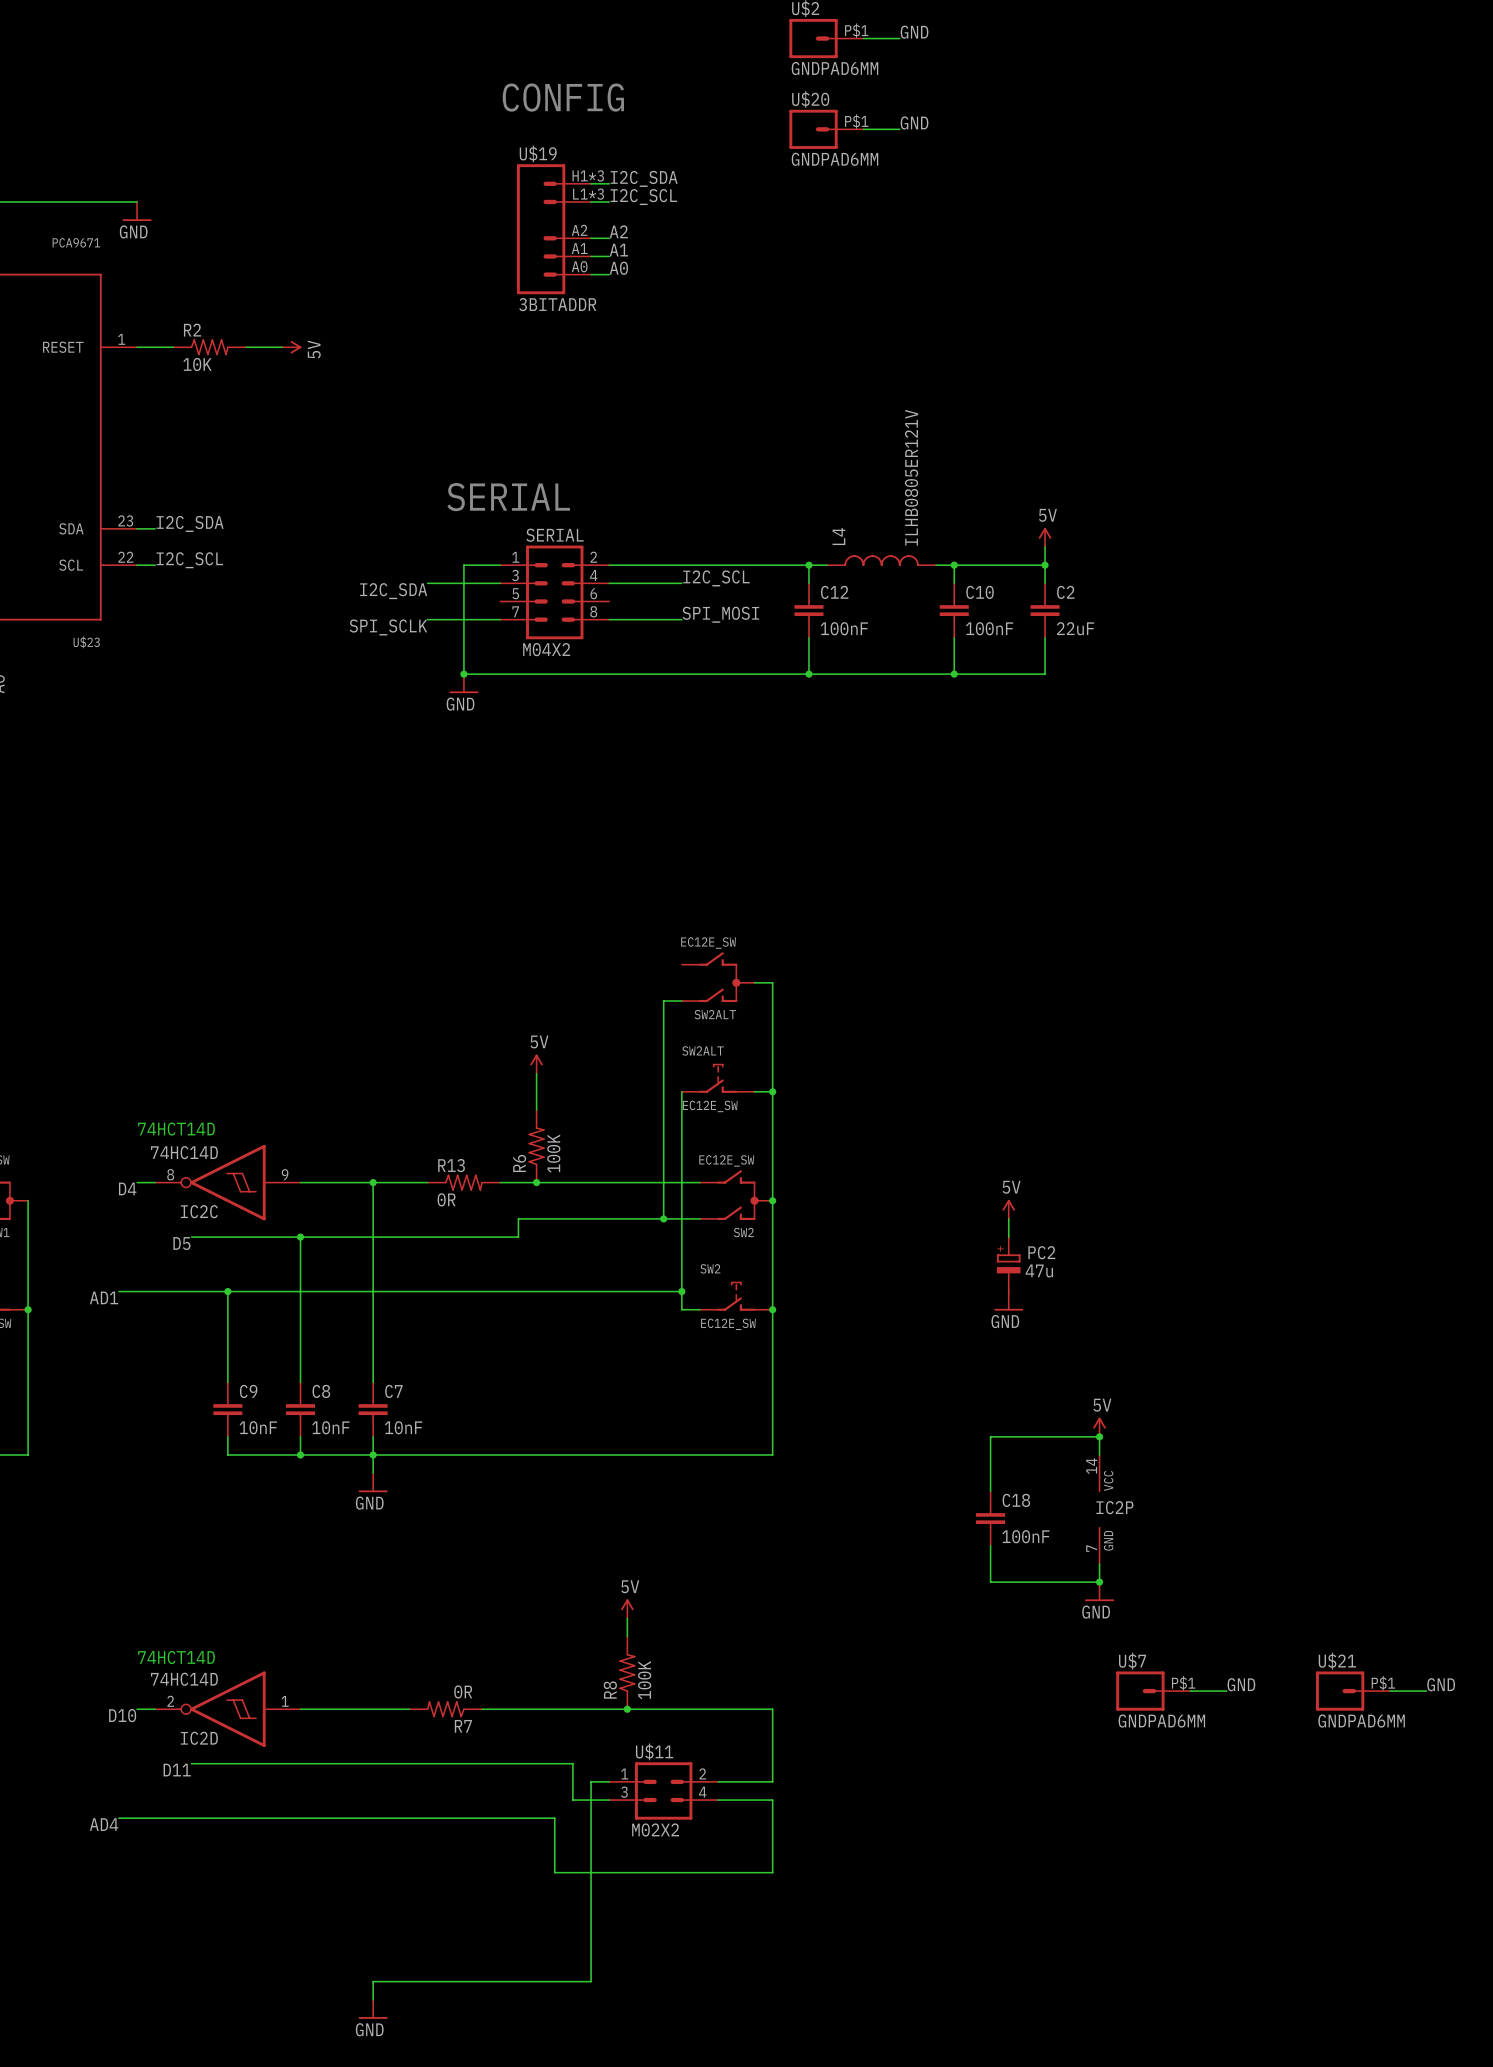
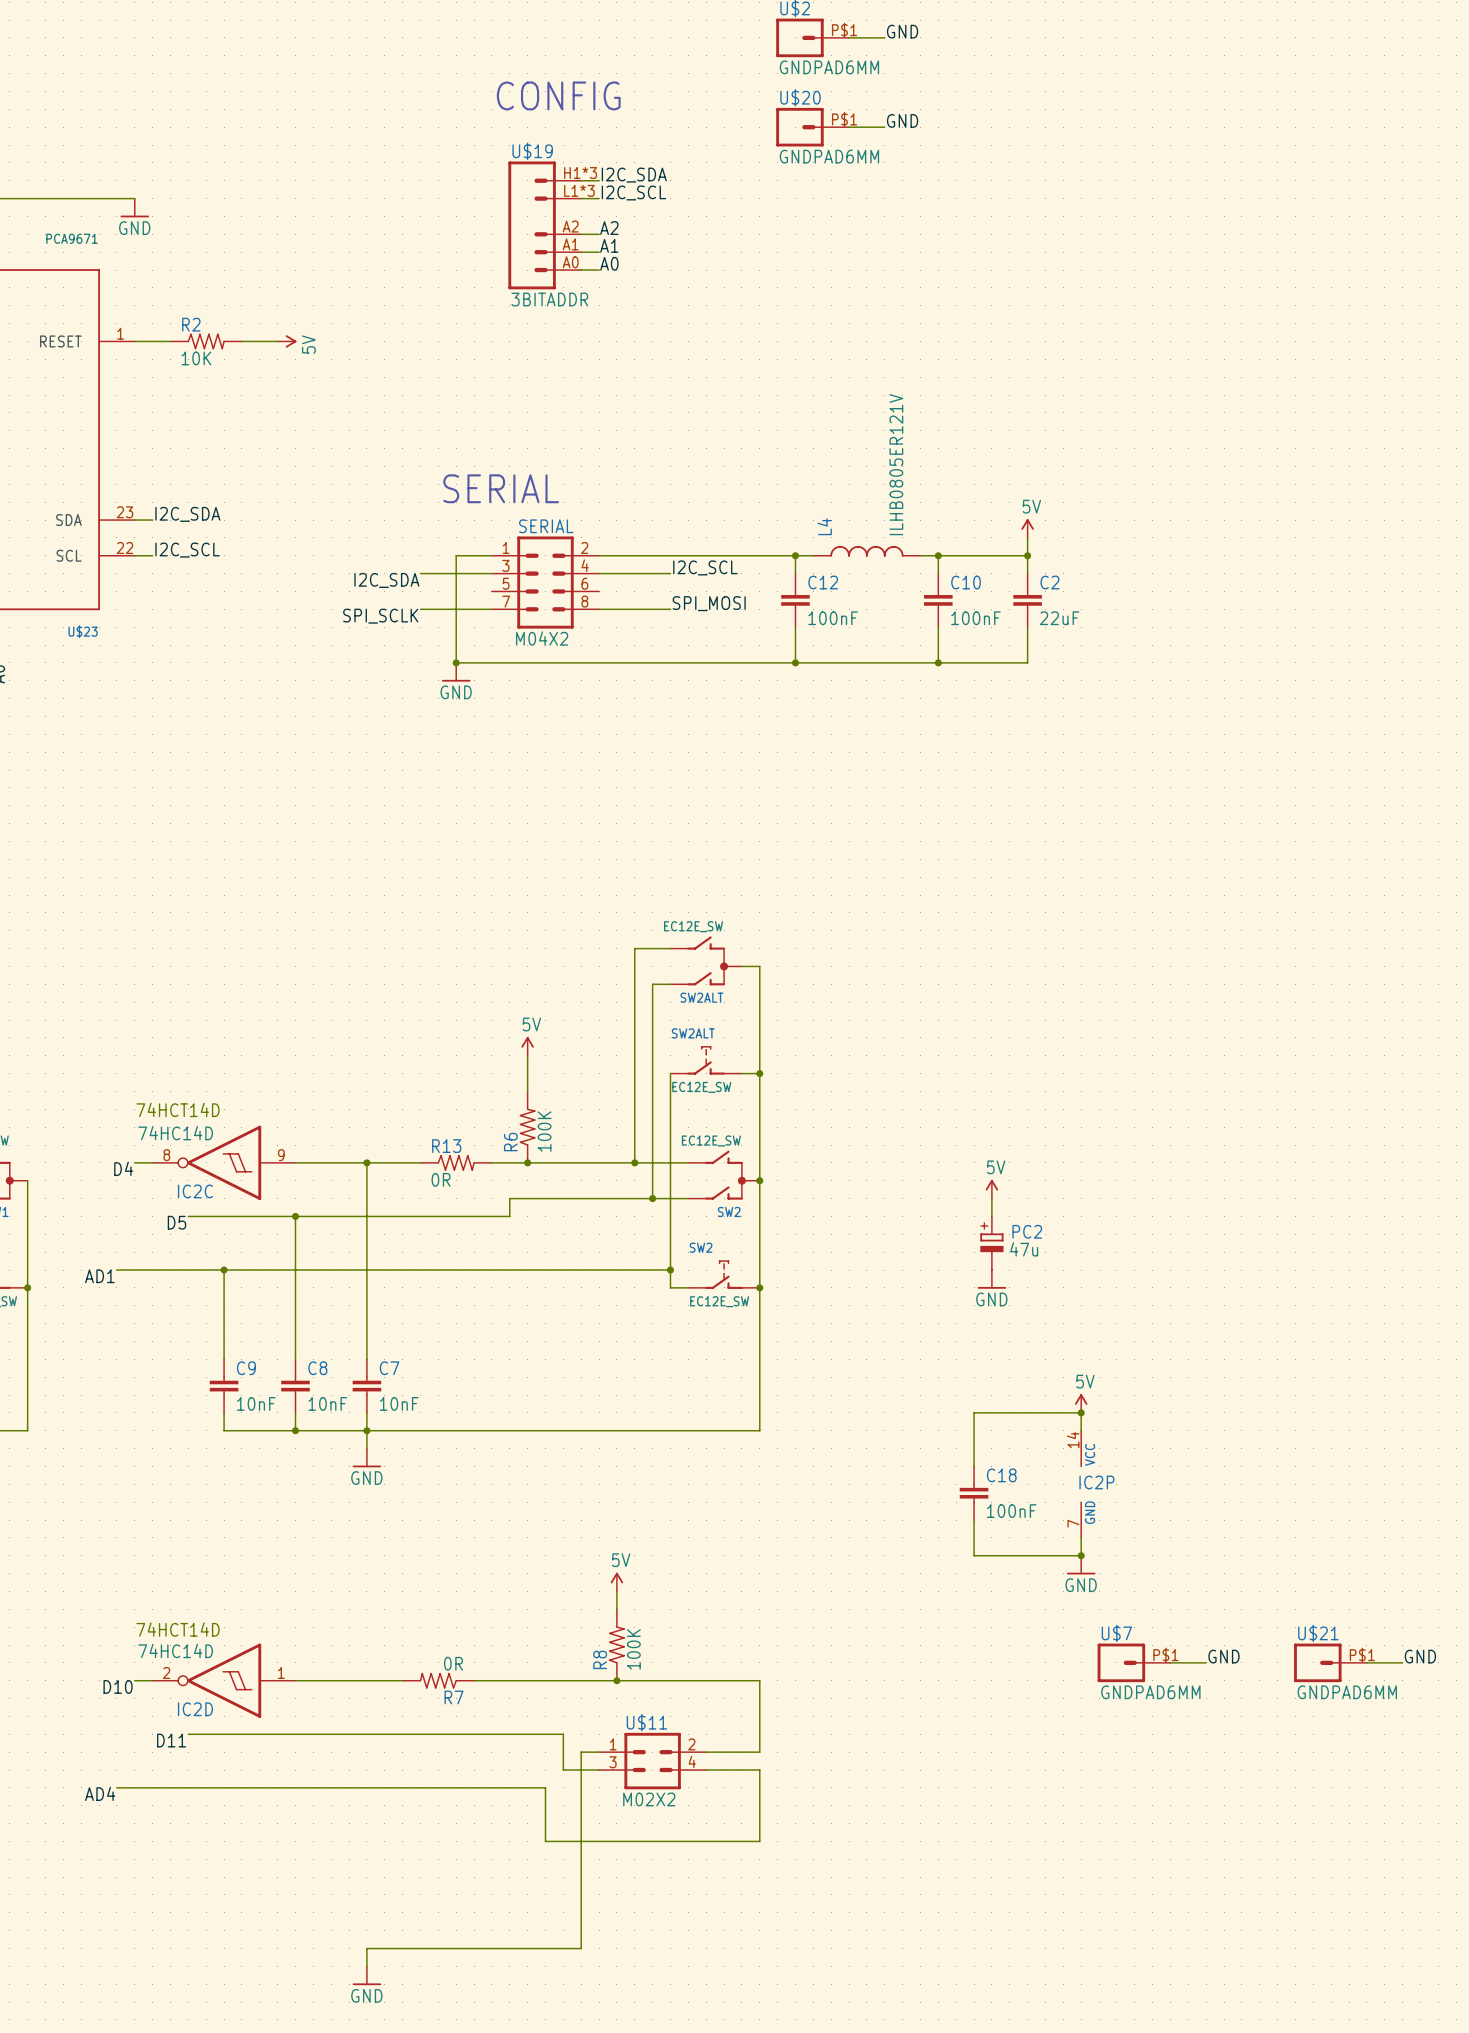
wire: none -> (670, 948) (634, 948) (634, 1162)
junction: none -> (634, 1162)

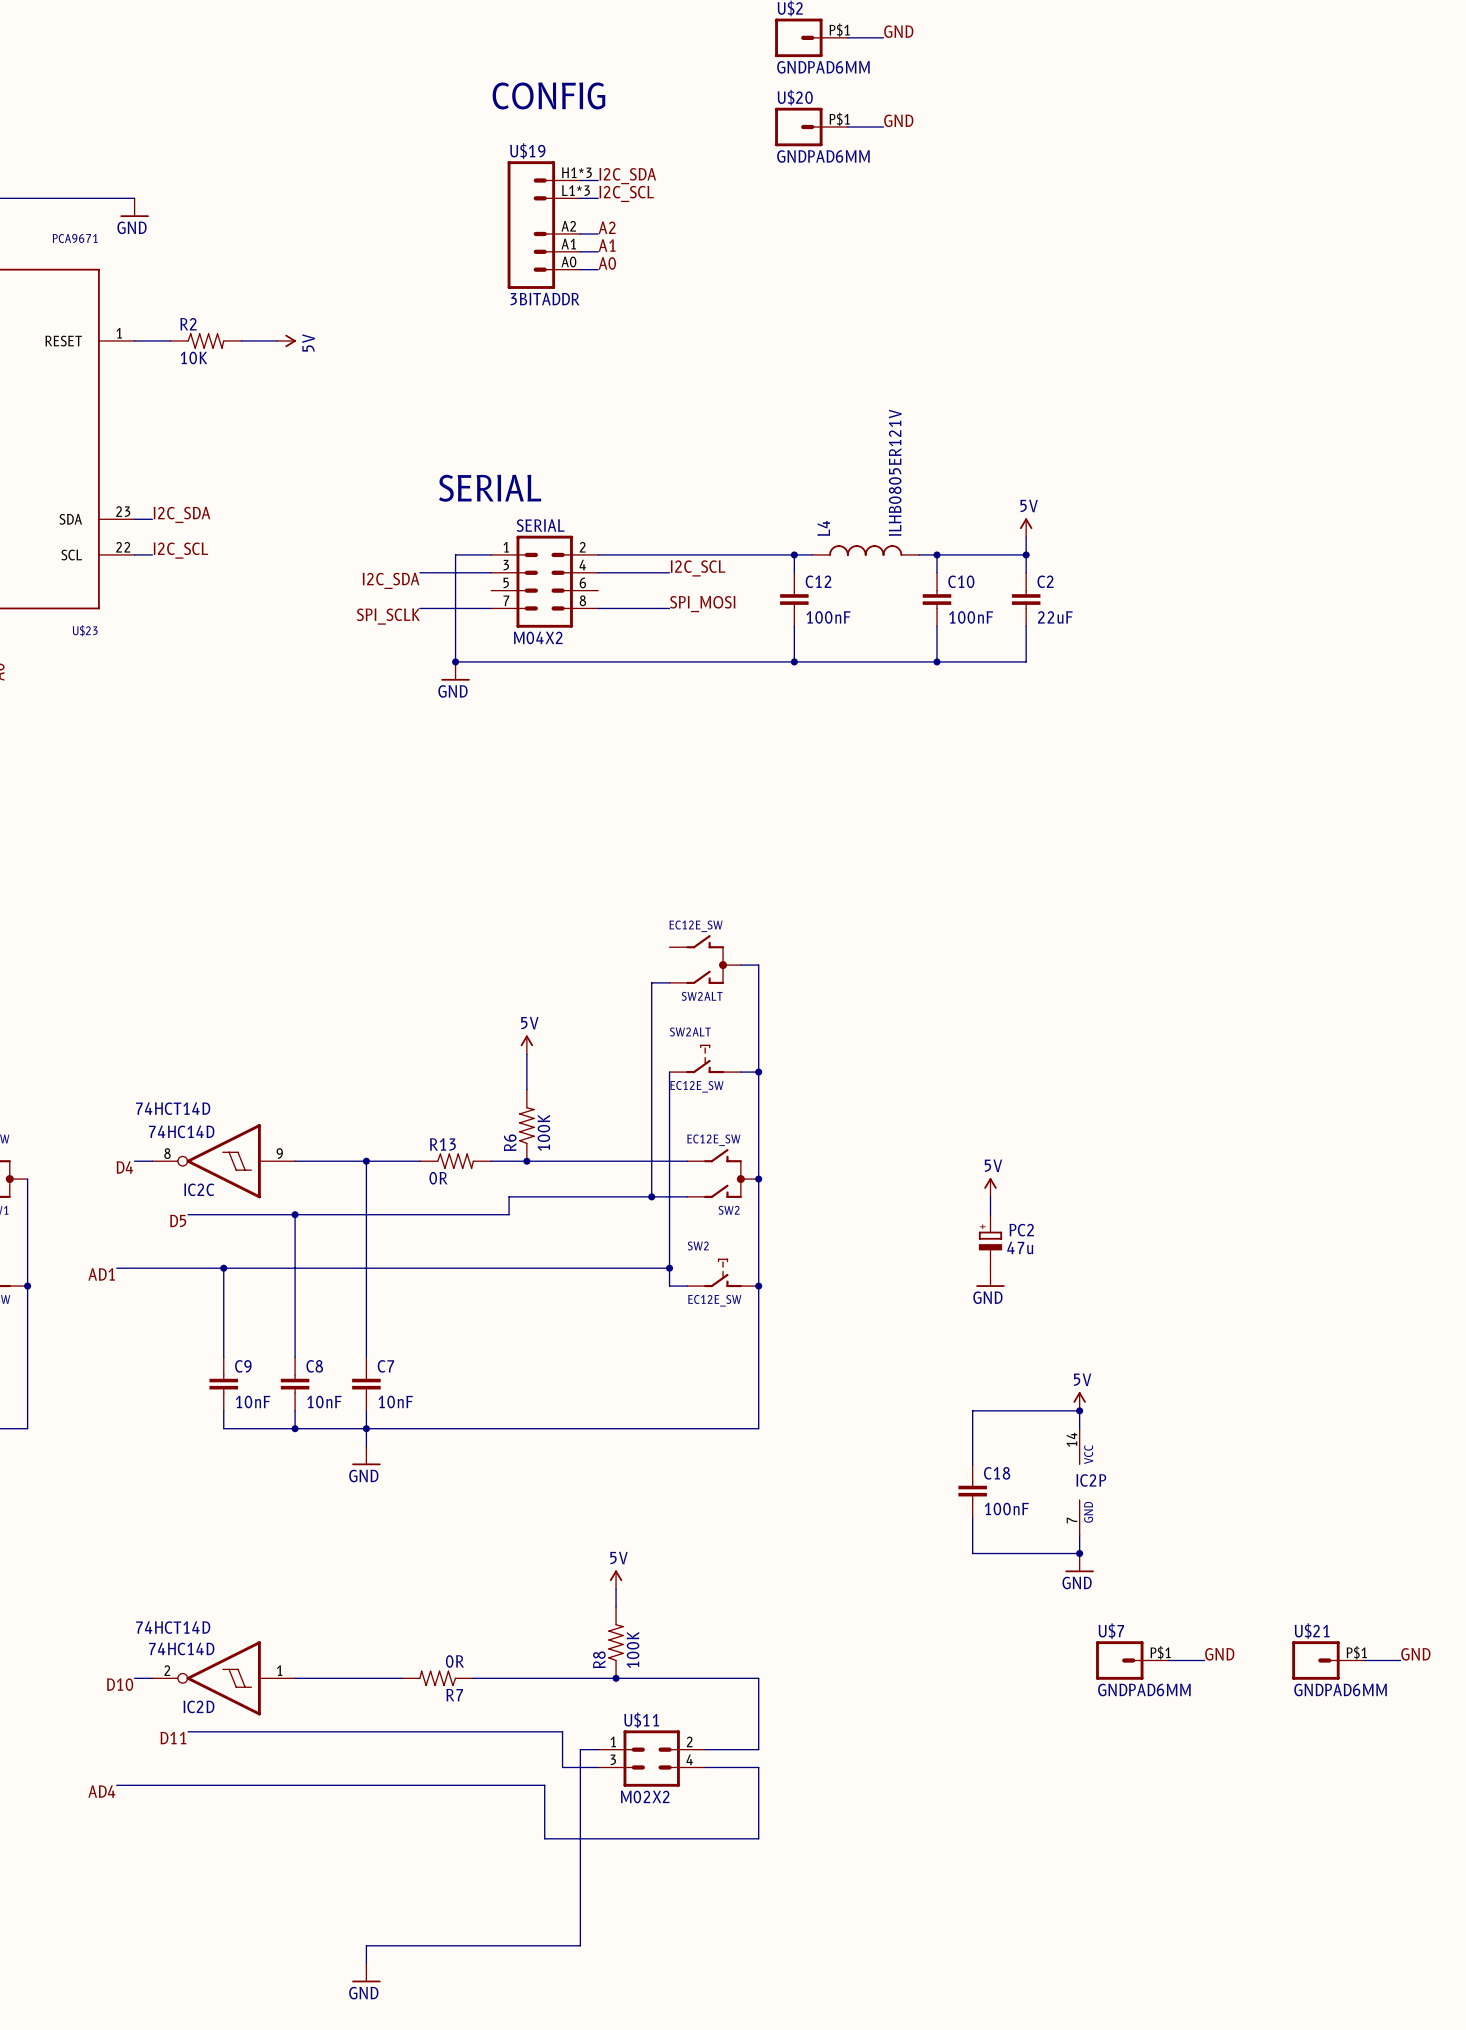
wire: (670, 948) (634, 948) (634, 1162) -> none
junction: (634, 1162) -> none

